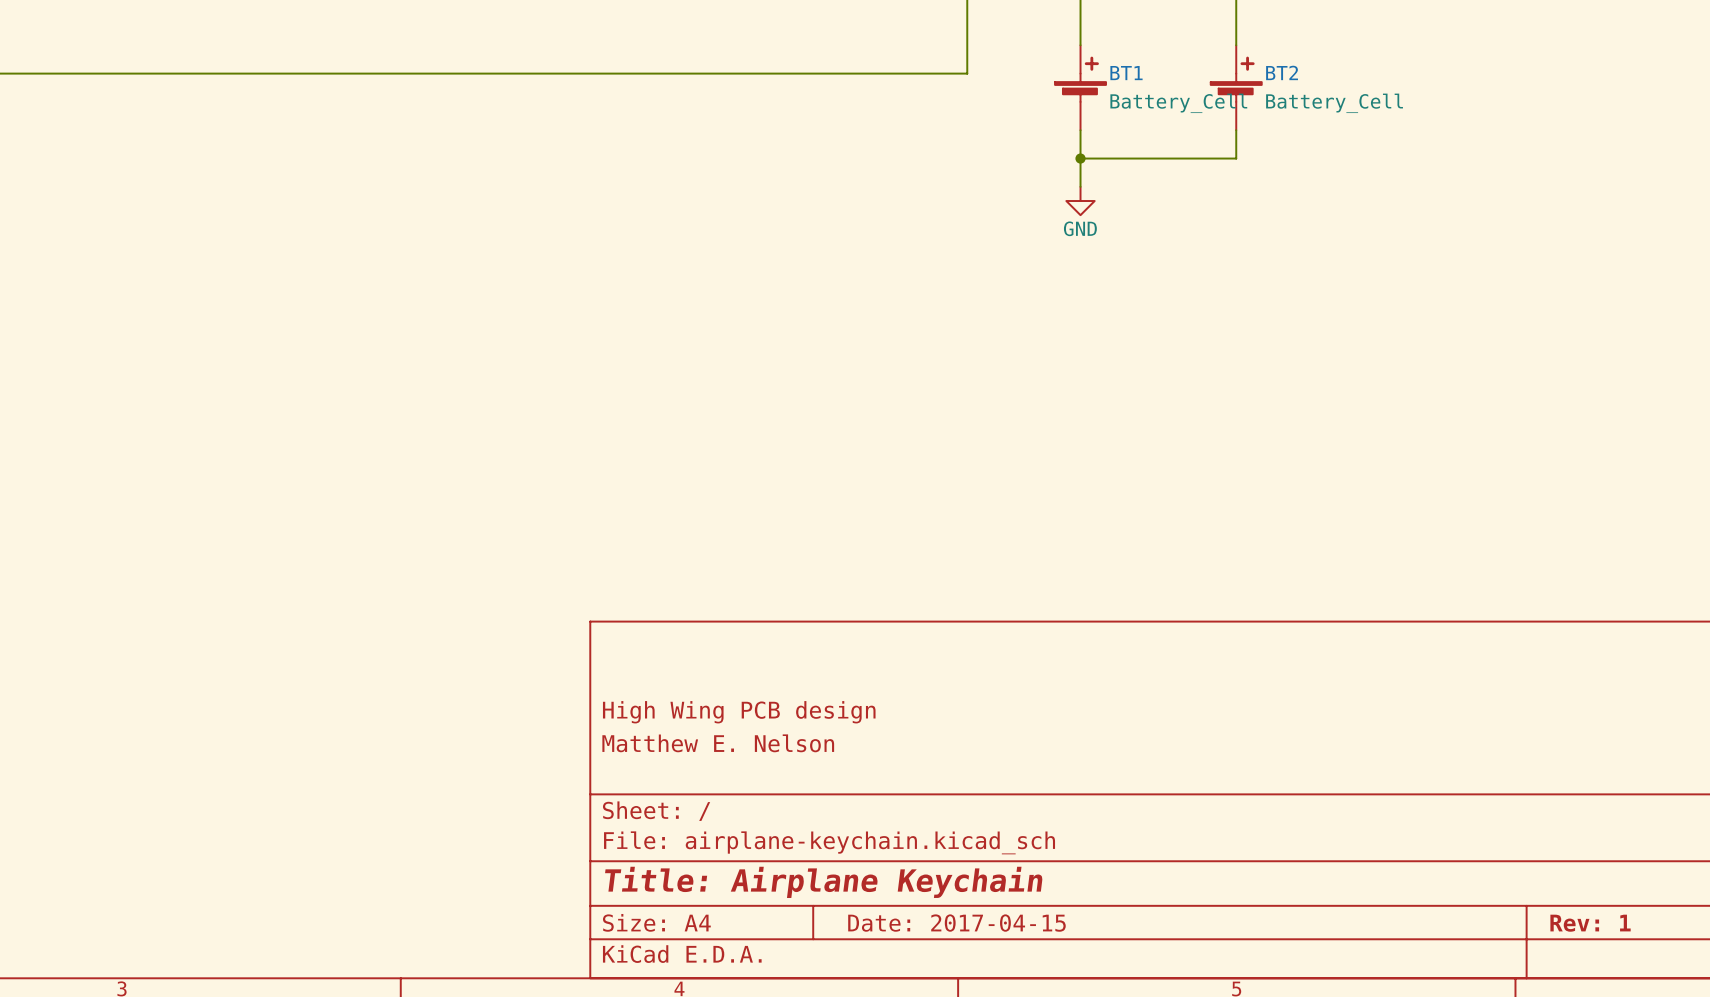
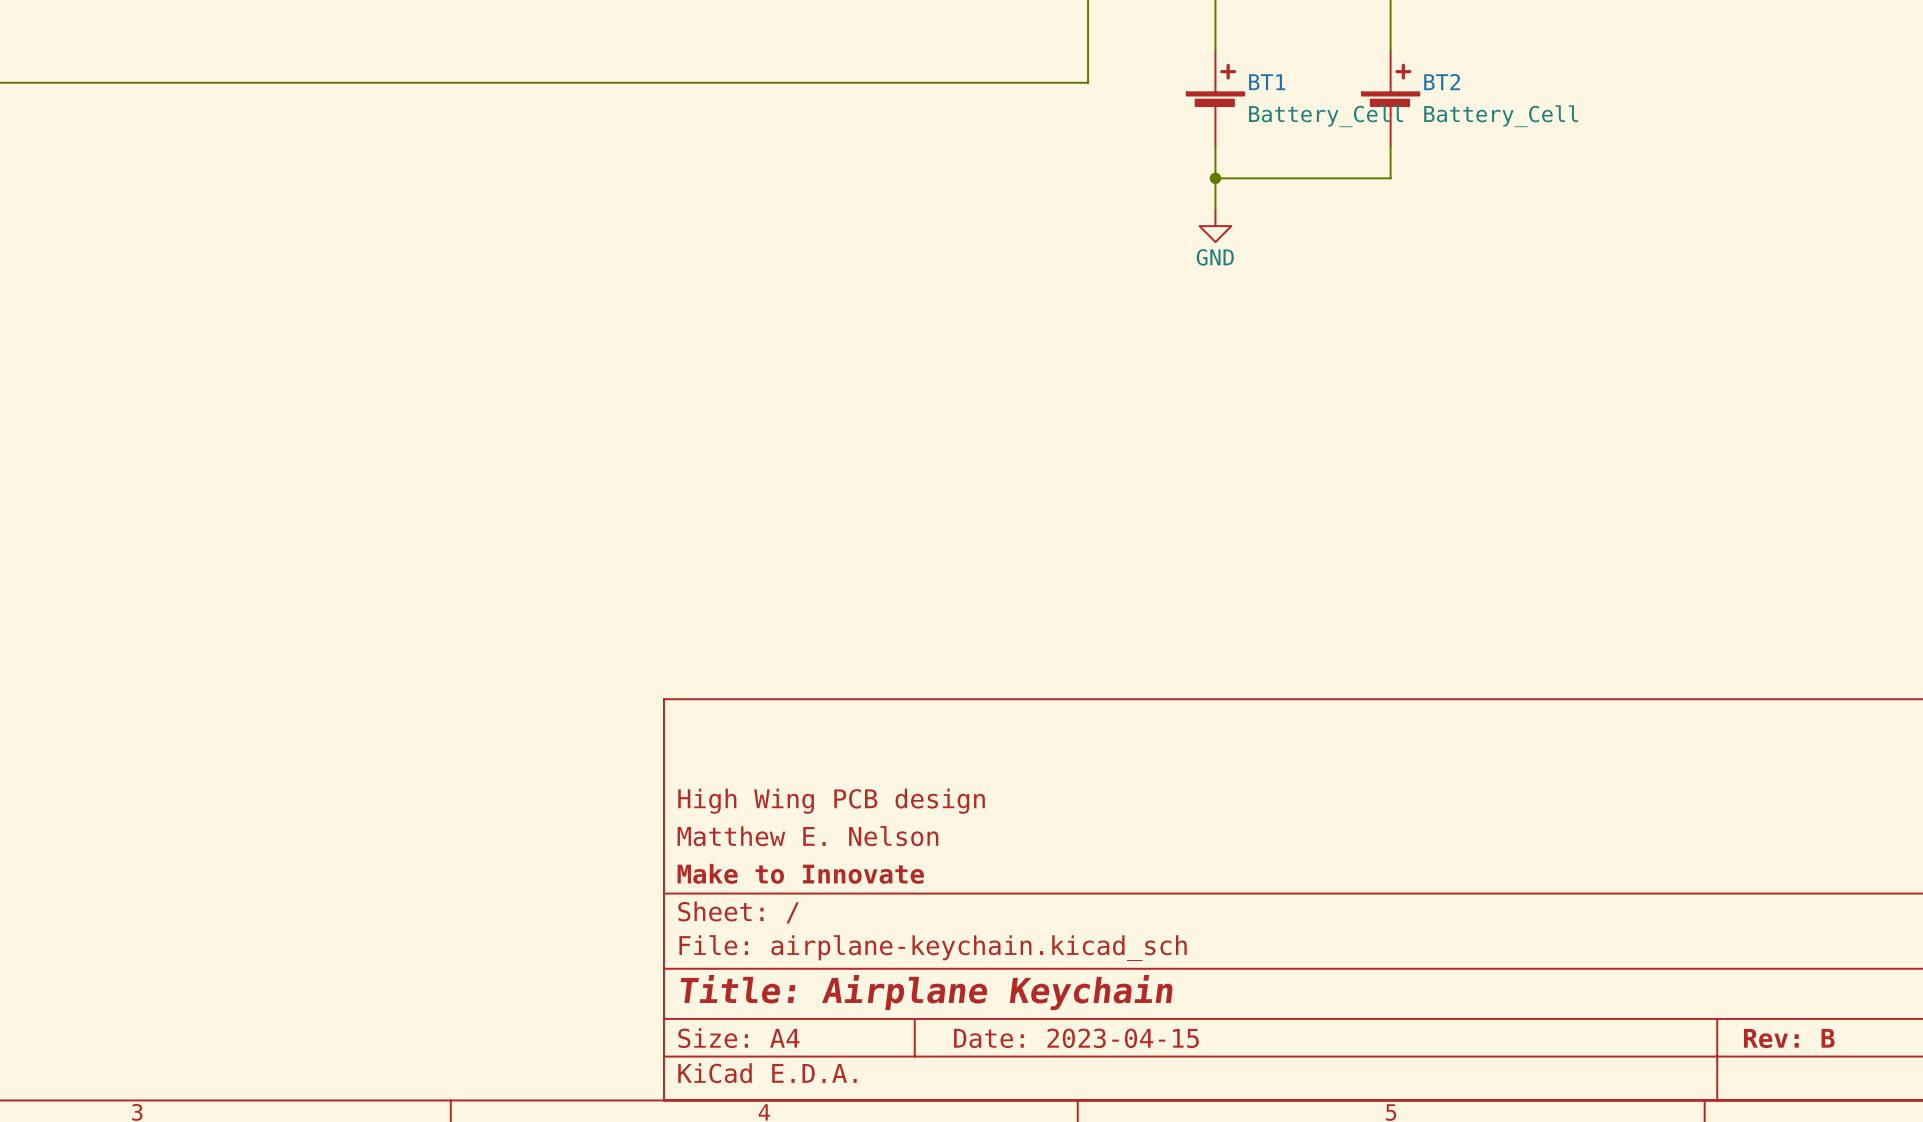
title block: none -> Make to Innovate (800, 873)
title block: Date: 2017-04-15 (956, 923) -> Date: 2023-04-15 (1076, 1038)
title block: Rev: 1 (1590, 923) -> Rev: B (1789, 1038)

